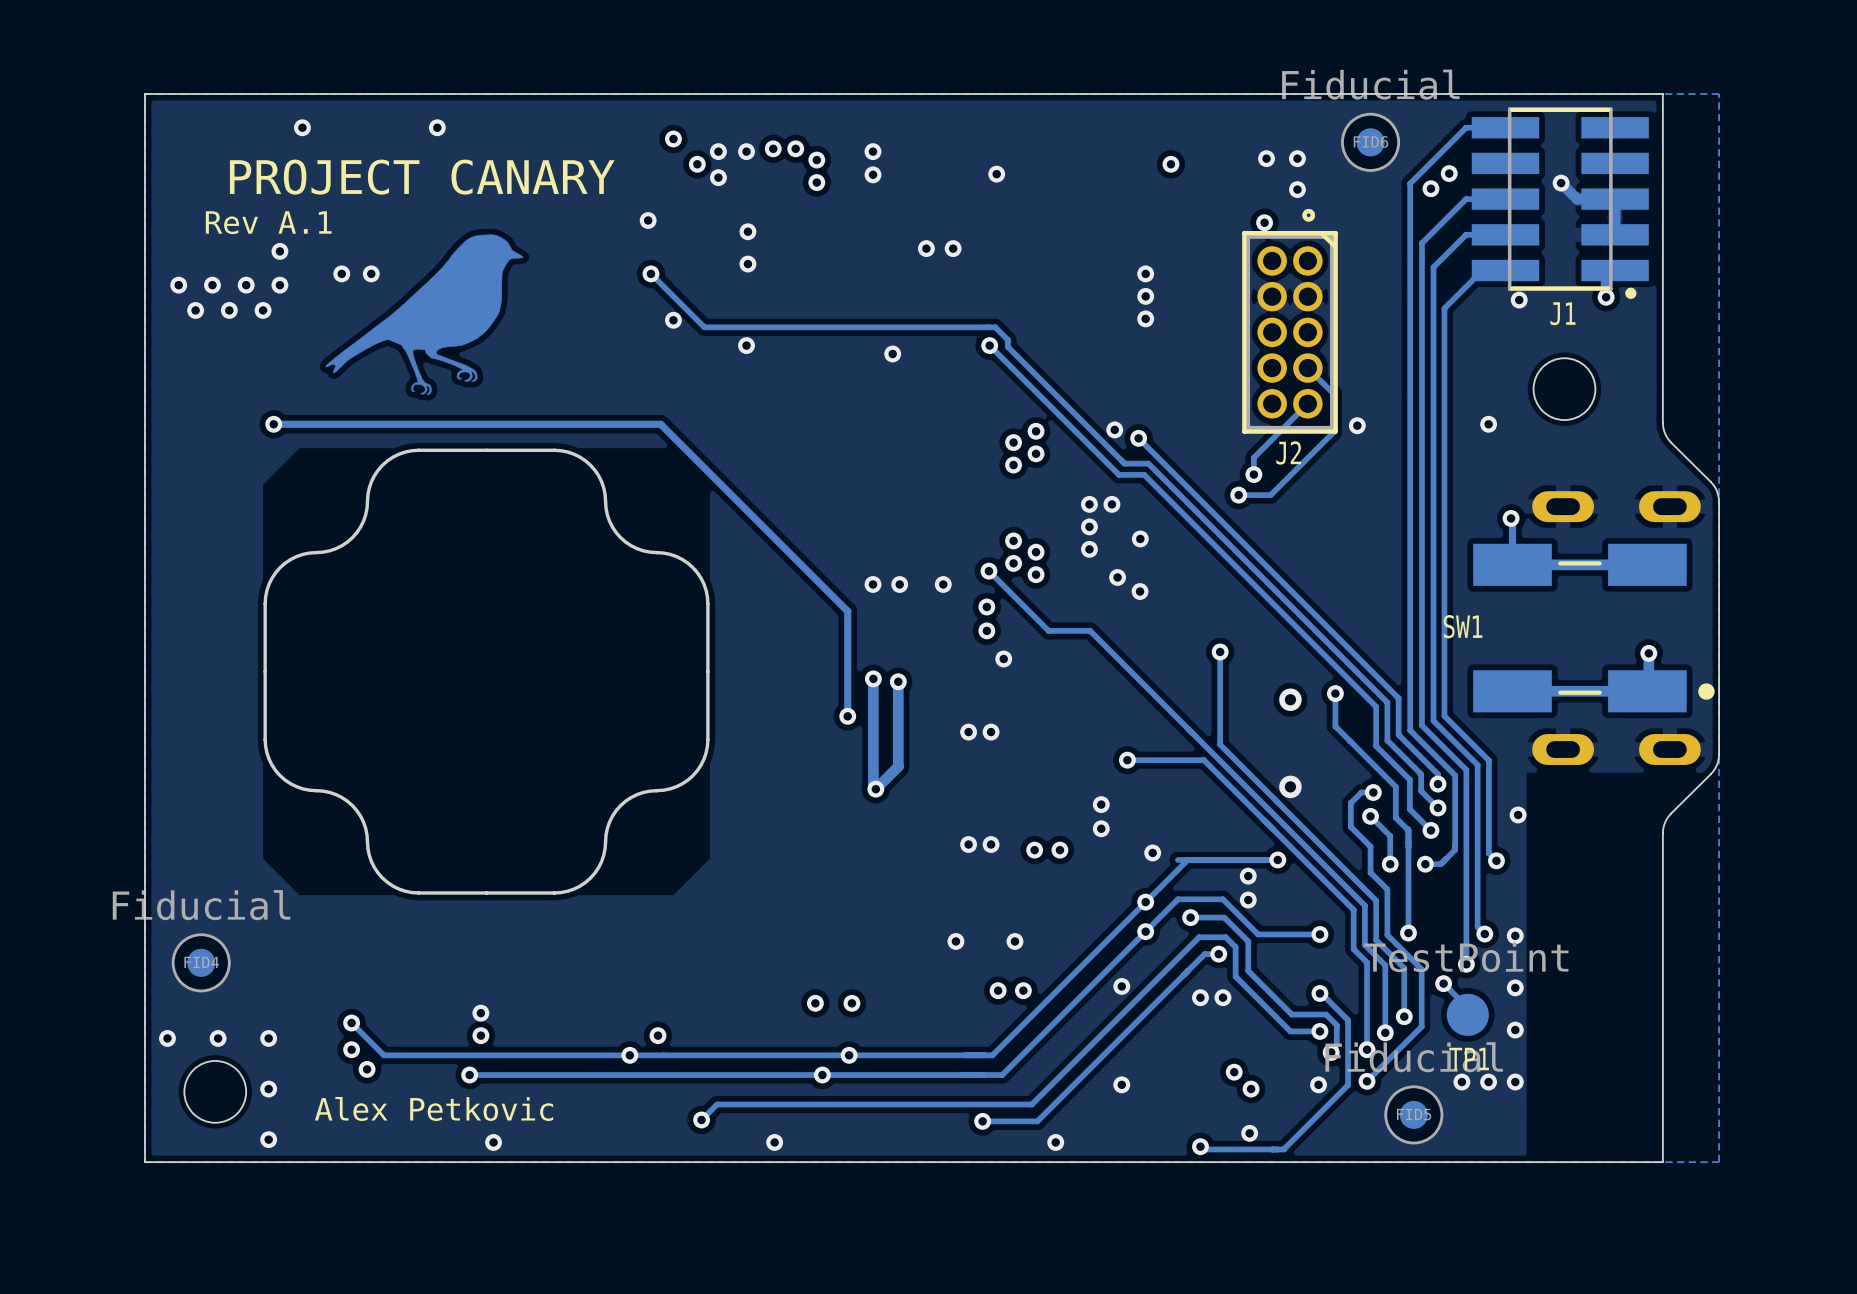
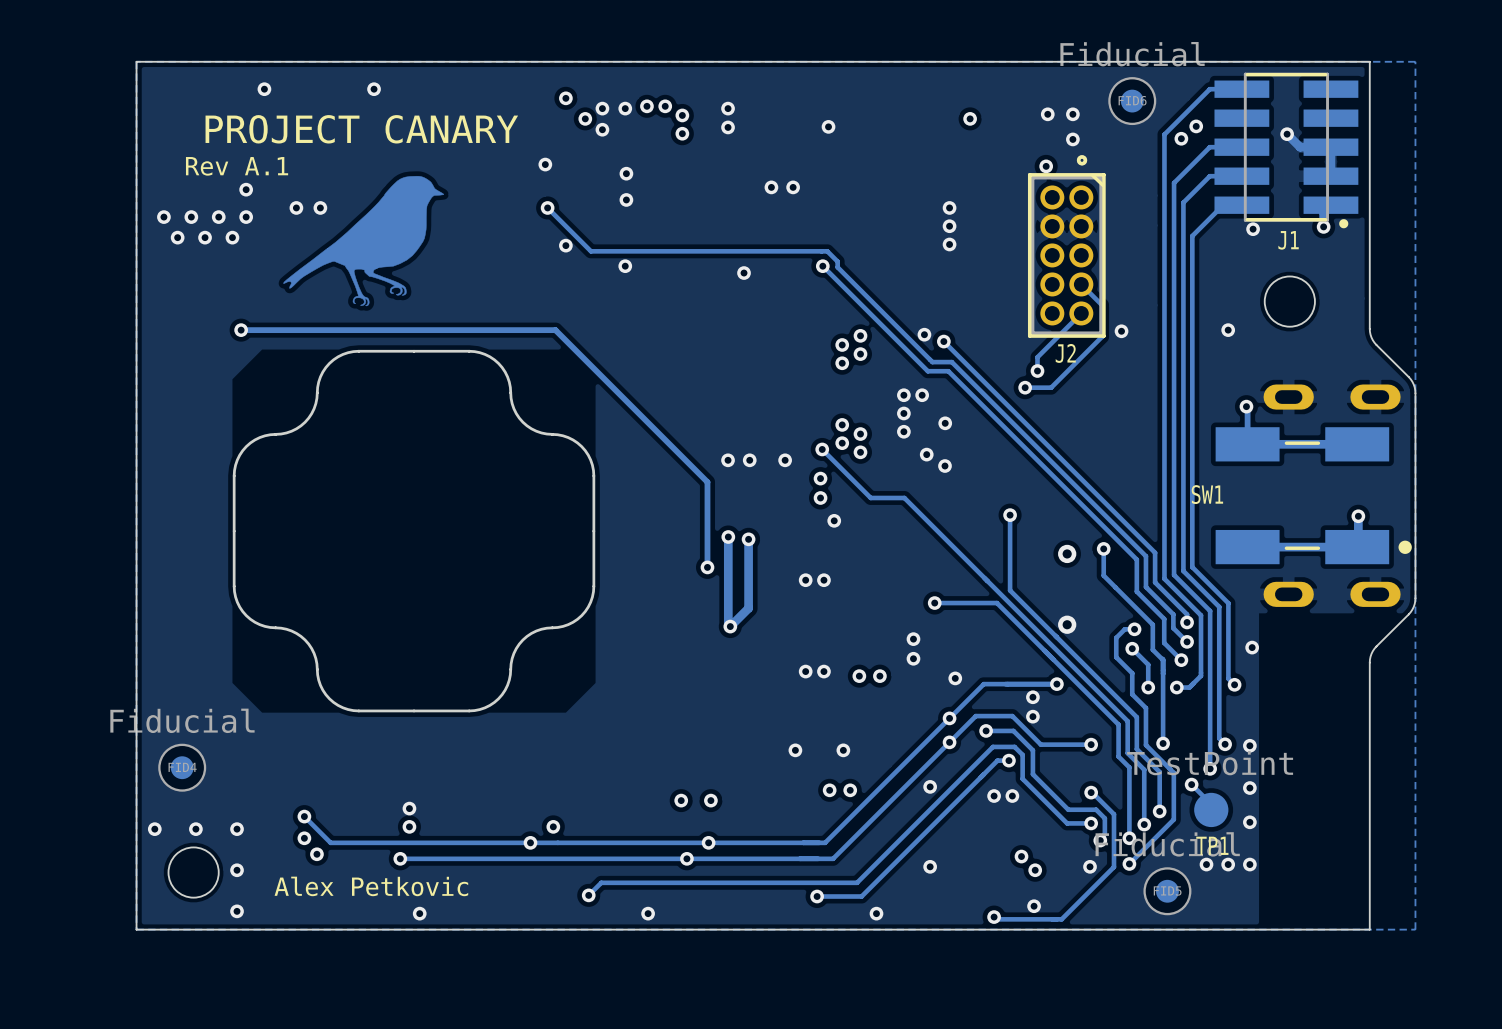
track: (1187, 859) (1178, 859) -> none

